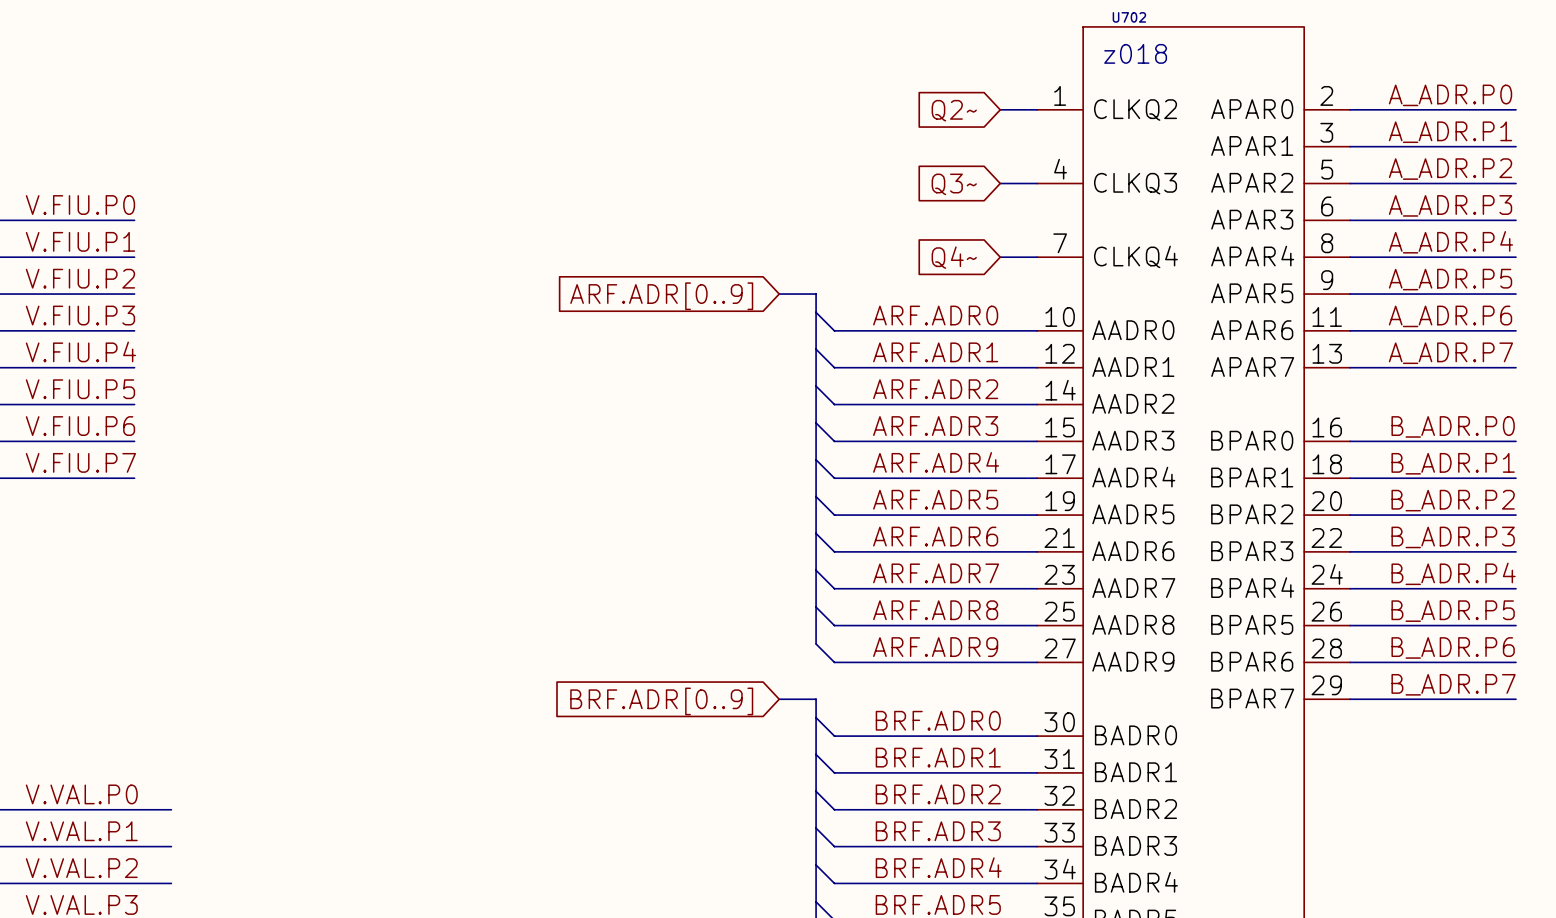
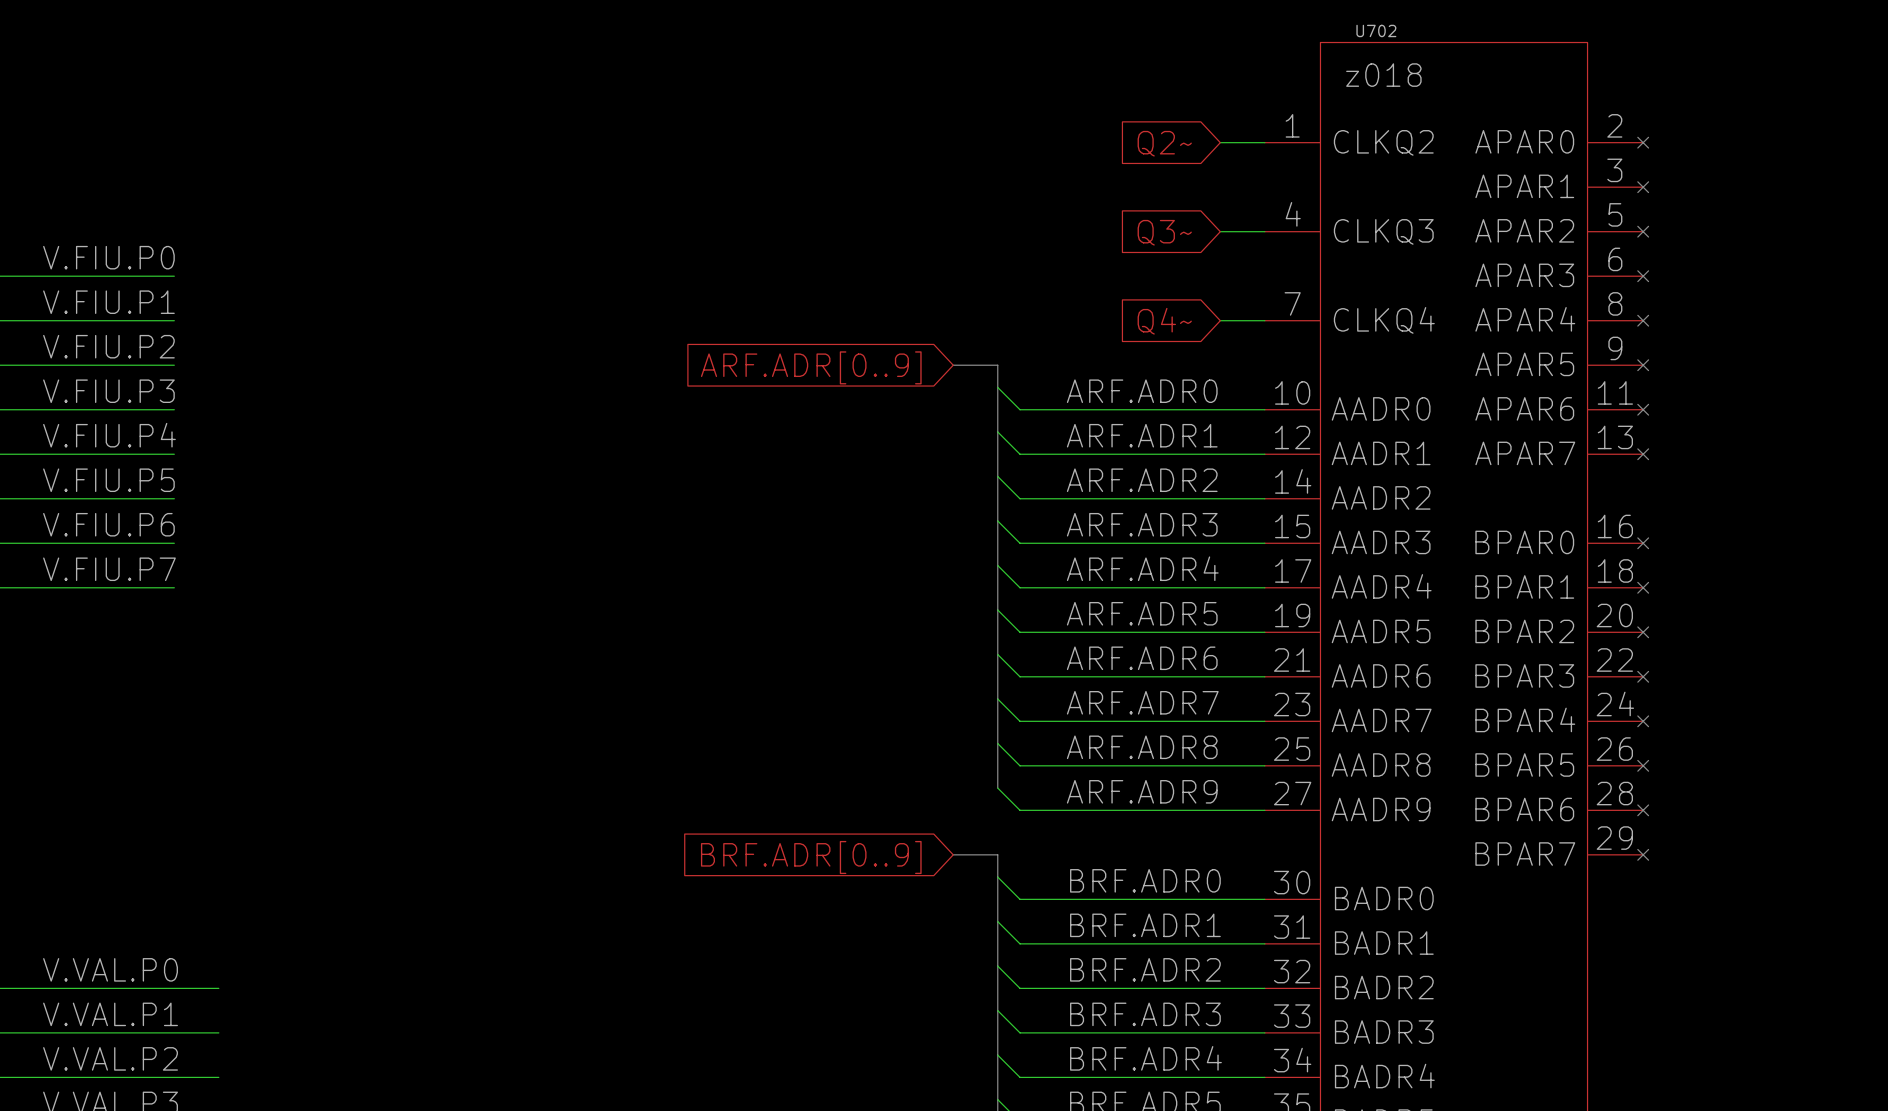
label: A_ADR.P0 (1450, 95) -> none
wire: (1350, 109) (1515, 109) -> none
no-connect mark: none -> (1643, 142)
label: A_ADR.P1 (1450, 132) -> none
wire: (1350, 146) (1515, 146) -> none
no-connect mark: none -> (1643, 187)
label: A_ADR.P2 (1450, 169) -> none
wire: (1350, 183) (1515, 183) -> none
no-connect mark: none -> (1643, 231)
label: A_ADR.P3 (1450, 205) -> none
wire: (1350, 220) (1515, 220) -> none
no-connect mark: none -> (1643, 276)
label: A_ADR.P4 (1450, 242) -> none
wire: (1350, 257) (1515, 257) -> none
no-connect mark: none -> (1643, 320)
label: A_ADR.P5 (1450, 279) -> none
wire: (1350, 294) (1515, 294) -> none
no-connect mark: none -> (1643, 365)
label: A_ADR.P6 (1450, 316) -> none
wire: (1350, 330) (1515, 330) -> none
no-connect mark: none -> (1643, 409)
label: A_ADR.P7 (1450, 353) -> none
wire: (1350, 367) (1515, 367) -> none
no-connect mark: none -> (1643, 454)
label: B_ADR.P0 (1453, 426) -> none
wire: (1350, 441) (1515, 441) -> none
no-connect mark: none -> (1643, 543)
label: B_ADR.P1 (1453, 463) -> none
wire: (1350, 478) (1515, 478) -> none
no-connect mark: none -> (1643, 587)
label: B_ADR.P2 (1453, 500) -> none
wire: (1350, 515) (1515, 515) -> none
no-connect mark: none -> (1643, 632)
label: B_ADR.P3 (1453, 537) -> none
wire: (1350, 551) (1515, 551) -> none
no-connect mark: none -> (1643, 676)
label: B_ADR.P4 (1453, 573) -> none
wire: (1350, 588) (1515, 588) -> none
no-connect mark: none -> (1643, 721)
label: B_ADR.P5 (1453, 611) -> none
wire: (1350, 625) (1515, 625) -> none
no-connect mark: none -> (1643, 765)
label: B_ADR.P6 (1453, 647) -> none
wire: (1350, 662) (1515, 662) -> none
no-connect mark: none -> (1643, 810)
label: B_ADR.P7 (1453, 684) -> none
wire: (1350, 699) (1515, 699) -> none
no-connect mark: none -> (1643, 854)

